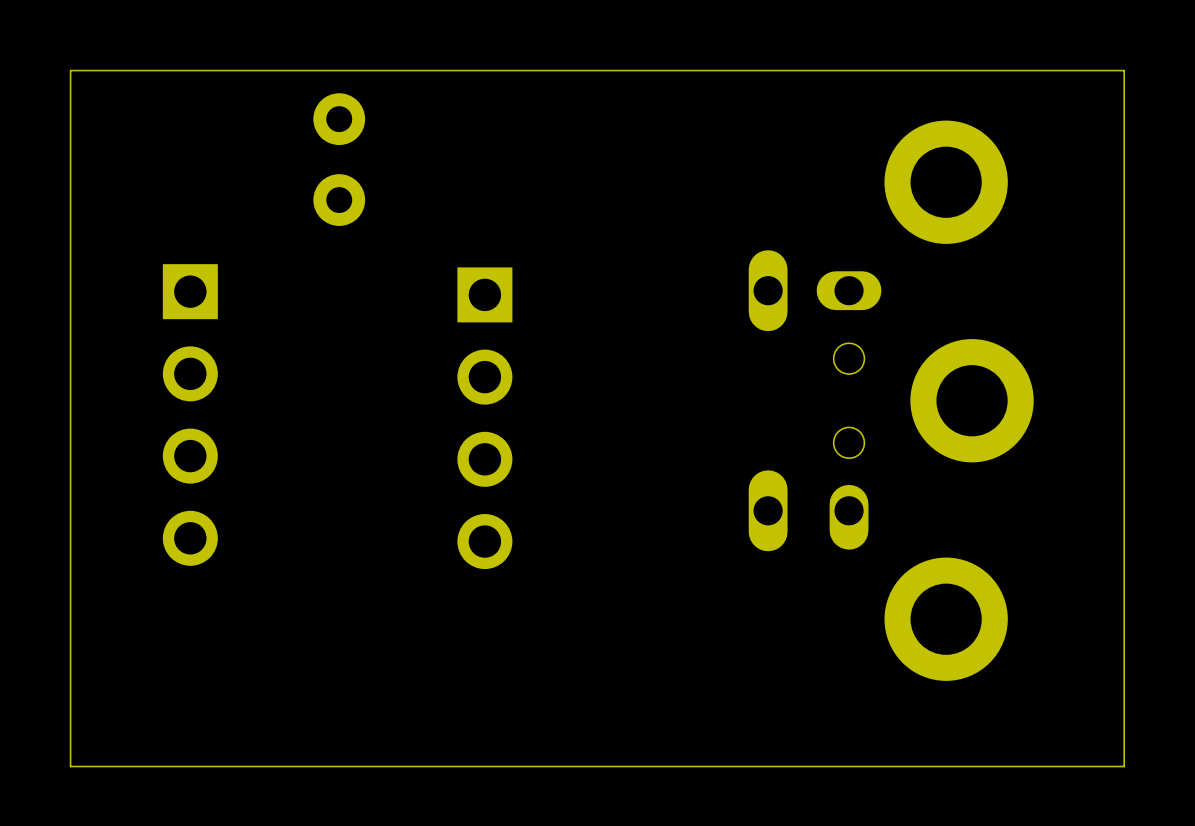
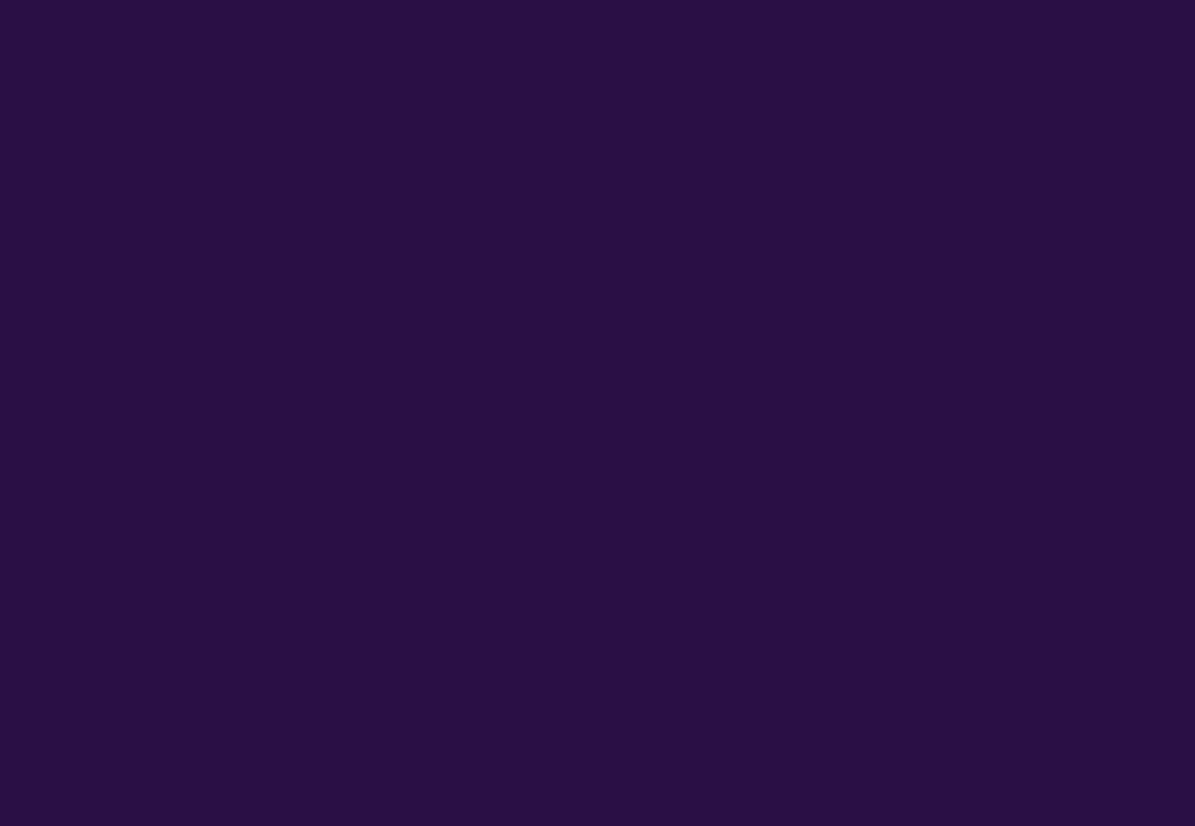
board edge: (1124, 70) (70, 70) (70, 766) (1124, 766) (1124, 70) -> none
part: (339, 159) -> none
part: (891, 400) -> none
part: (190, 414) -> none
part: (484, 418) -> none

